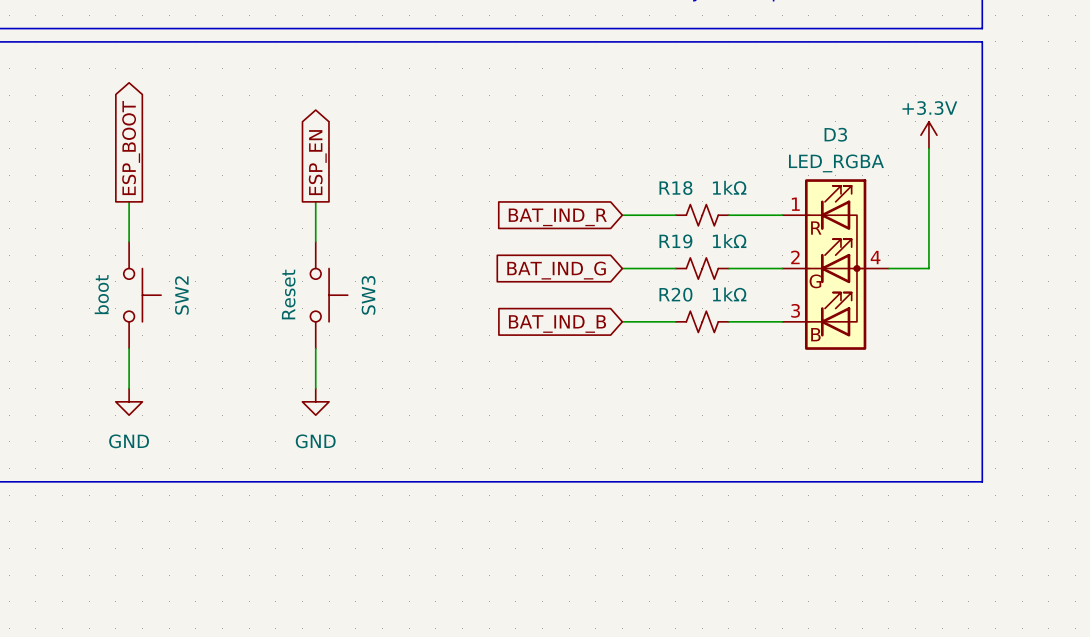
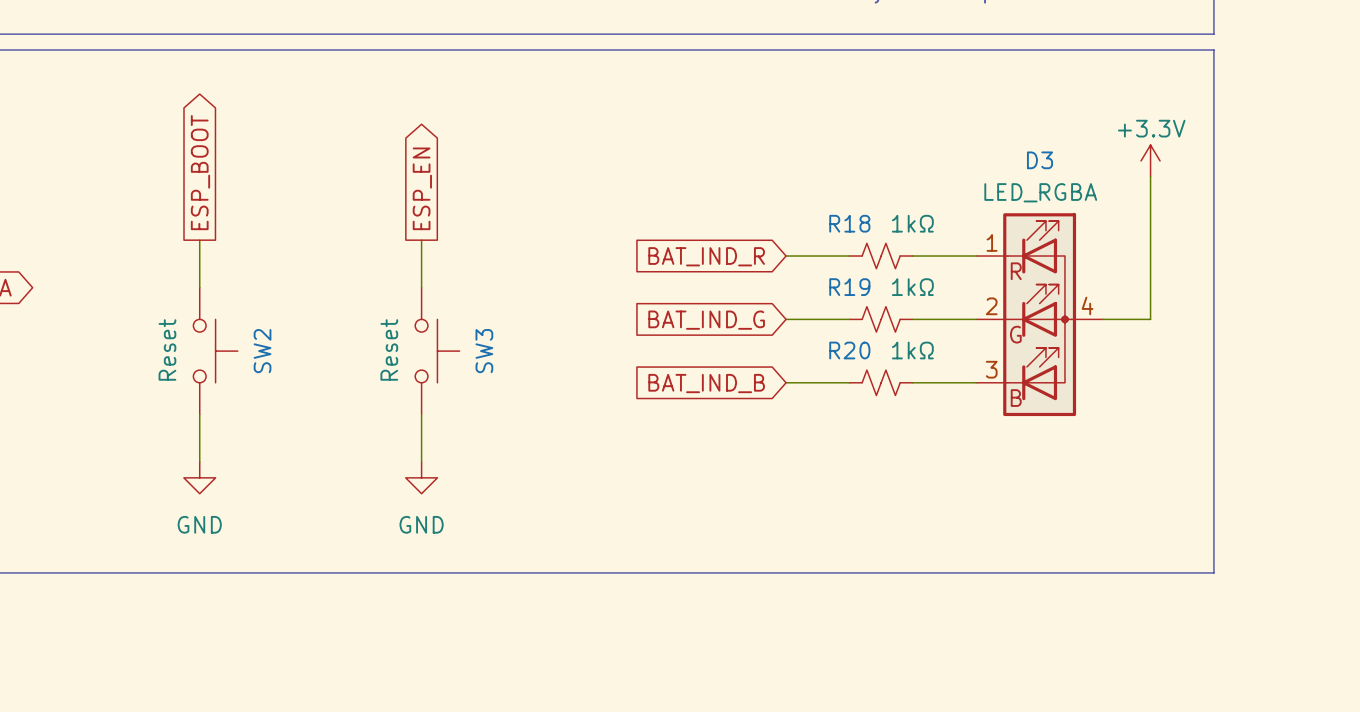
SW2 value: boot (101, 294) -> Reset (167, 349)

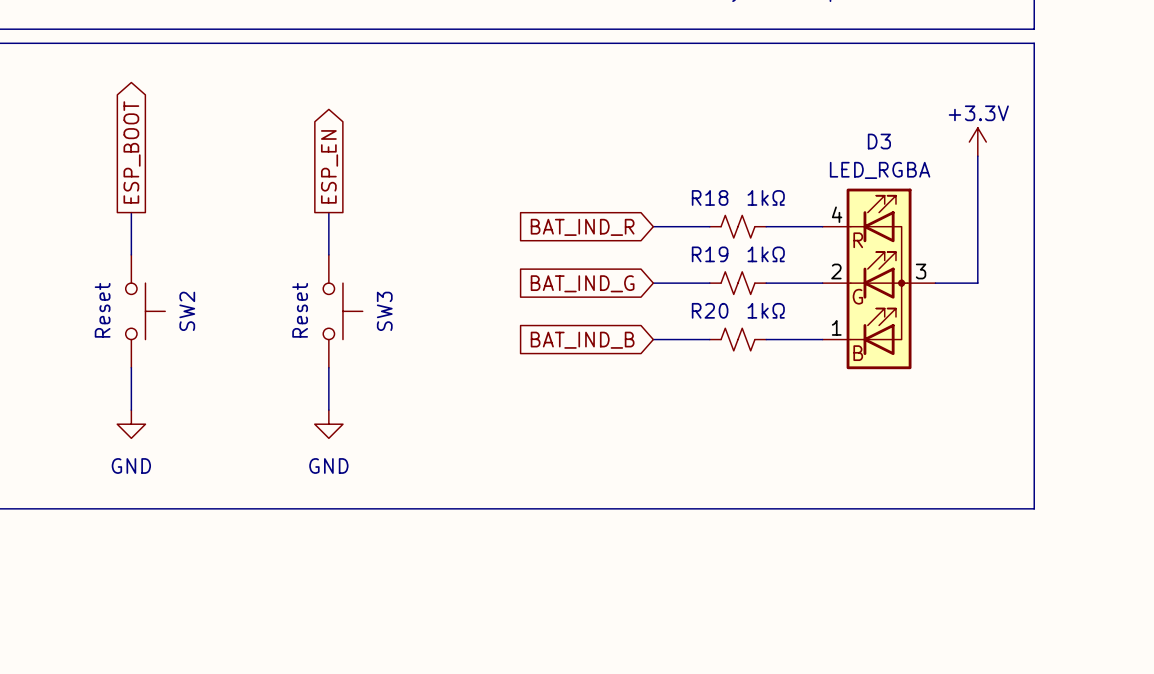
D3 pin number: 1 (992, 242) -> 4 (837, 214)
D3 pin number: 4 (1087, 305) -> 3 (921, 271)
D3 pin number: 3 (991, 369) -> 1 (836, 327)

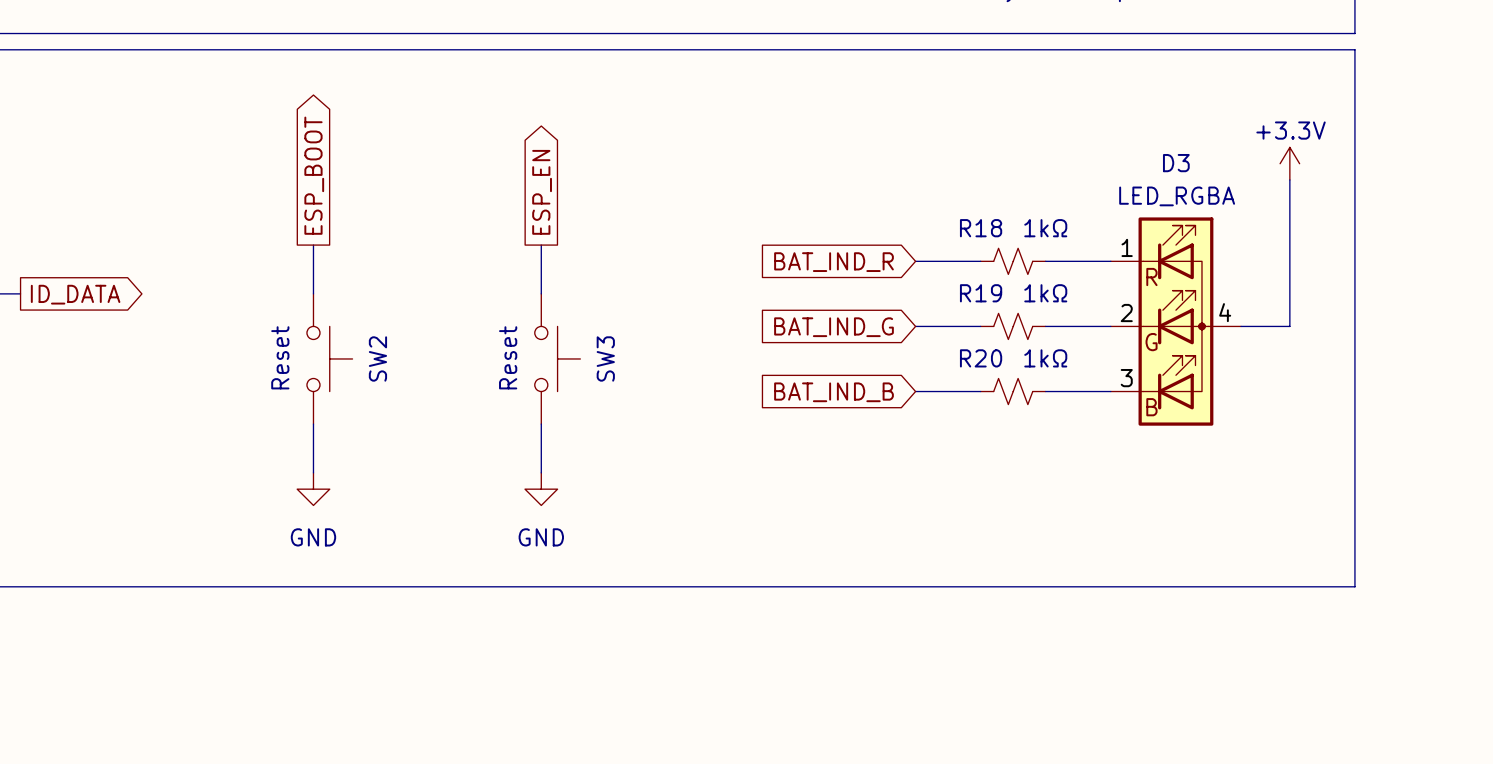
D3 pin number: 4 (837, 214) -> 1 (1127, 247)
D3 pin number: 3 (921, 271) -> 4 (1225, 312)
D3 pin number: 1 (836, 327) -> 3 (1126, 378)

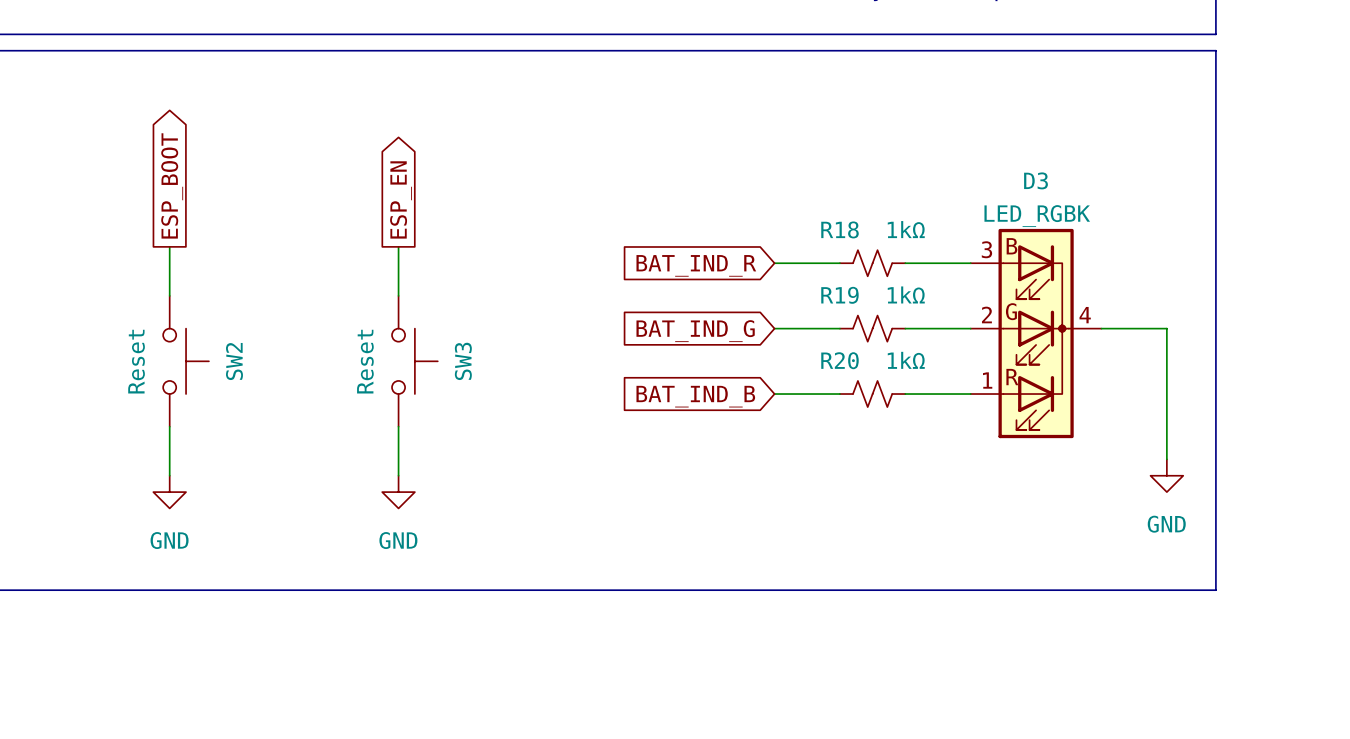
power symbol: +3.3V (1289, 163) -> none
wire: (1289, 179) (1289, 326) -> (1166, 459) (1166, 328) (1150, 328)
D3 value: LED_RGBA (1177, 196) -> LED_RGBK (1037, 216)
D3 symbol: [1110, 217, 1242, 426] -> [970, 228, 1102, 439]
power symbol: none -> GND (1166, 475)

